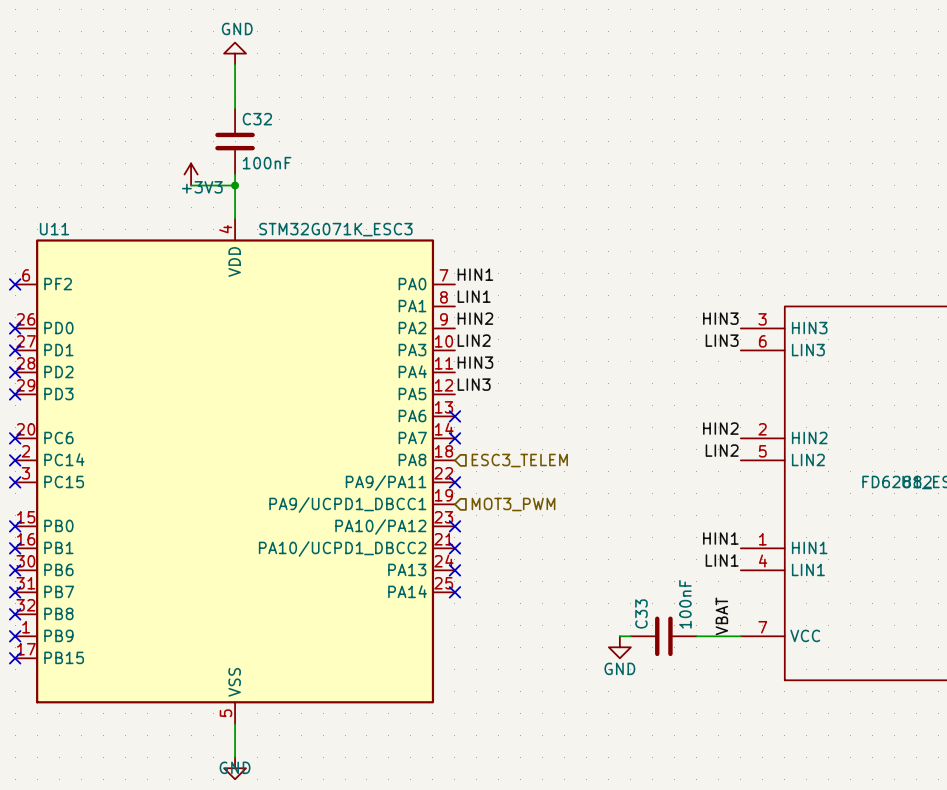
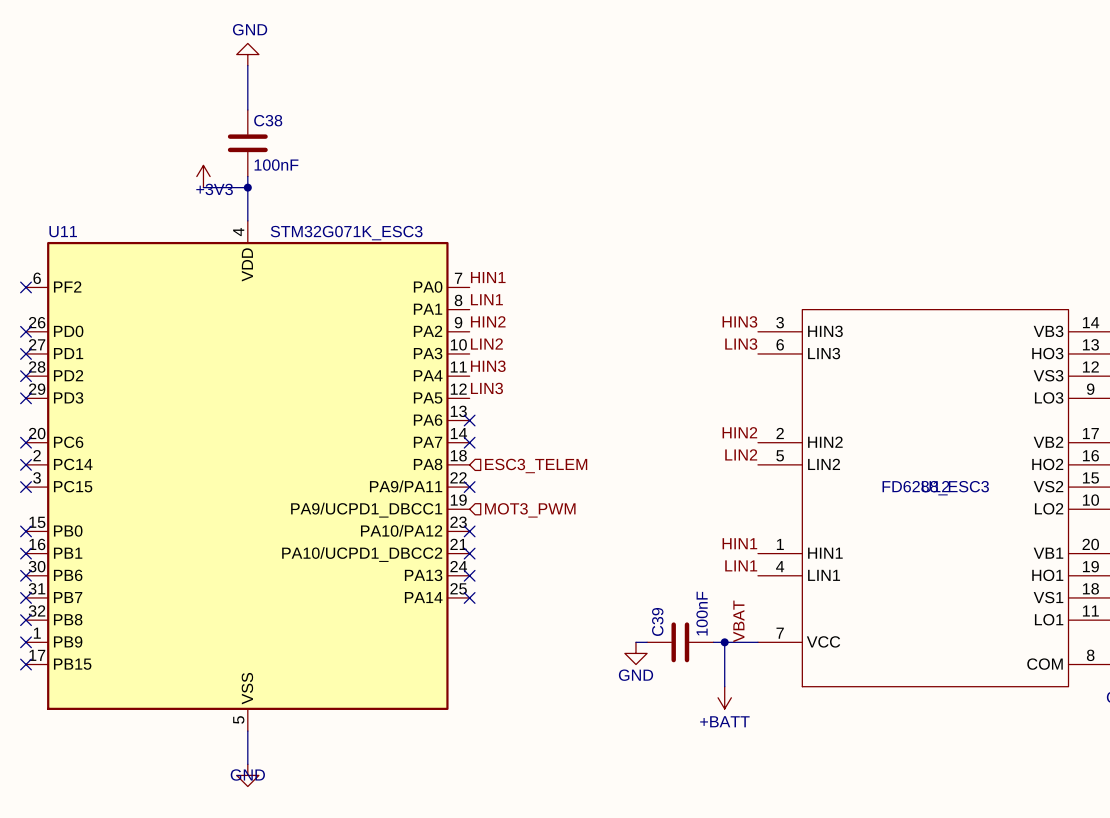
C32 name: C32 (257, 119) -> C38 (268, 120)
C33 name: C33 (641, 613) -> C39 (657, 621)
wire: none -> (724, 642) (724, 686)
junction: none -> (724, 642)
power symbol: none -> +BATT (724, 697)

